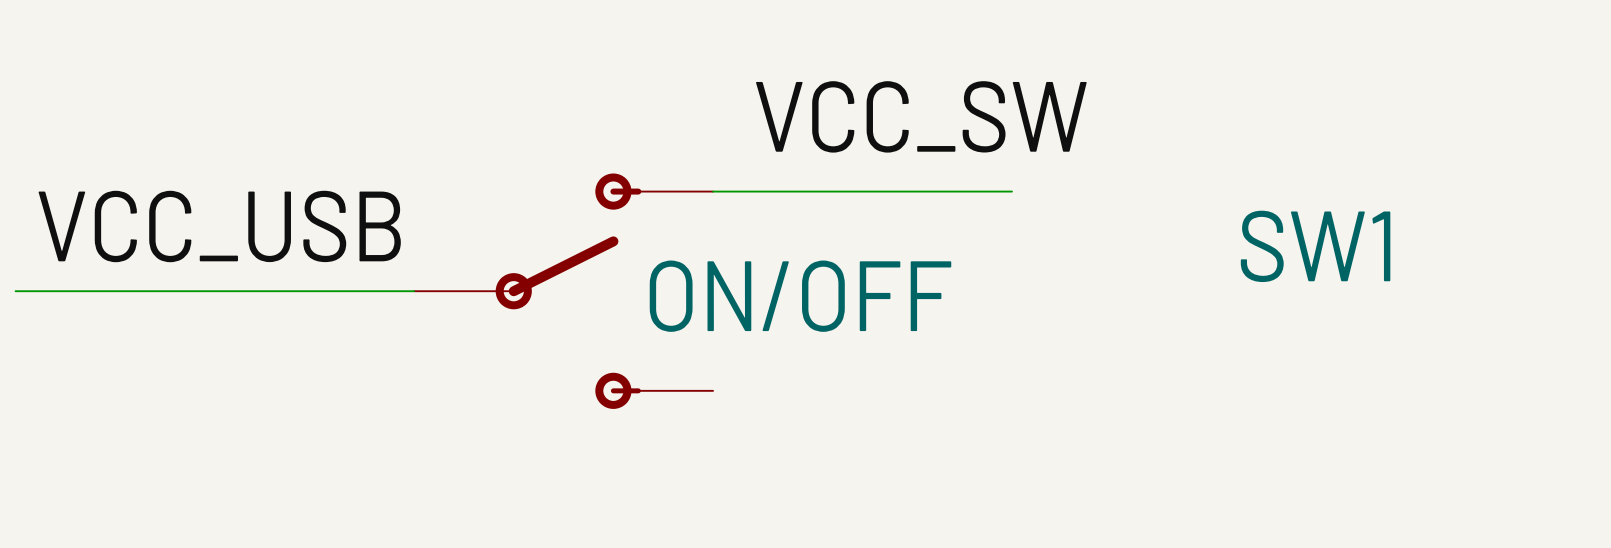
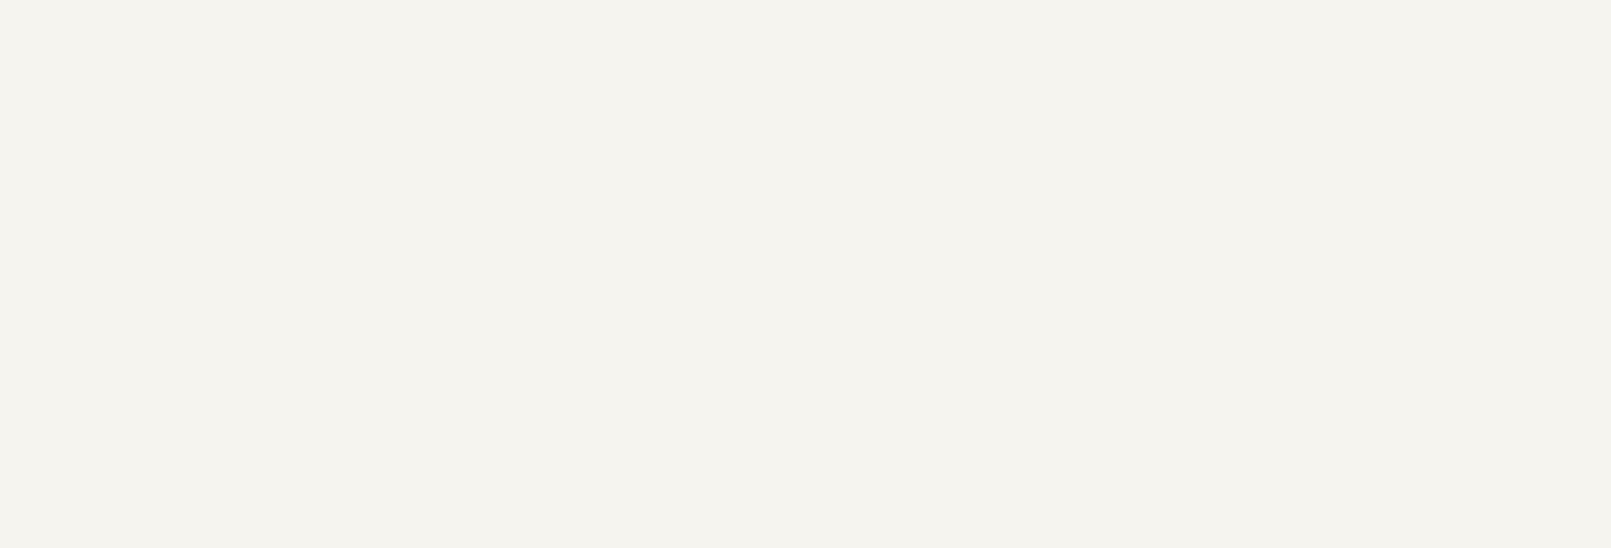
label: VCC_SW (921, 116) -> none
wire: (713, 191) (1011, 191) -> none
label: VCC_USB (219, 226) -> none
wire: (15, 291) (414, 291) -> none
SW1: ON/OFF (563, 291) -> none

